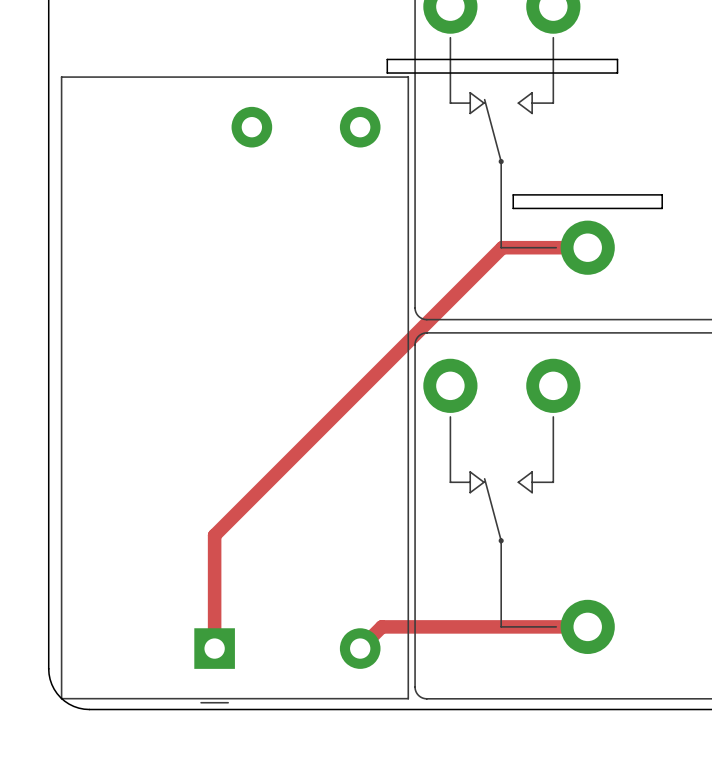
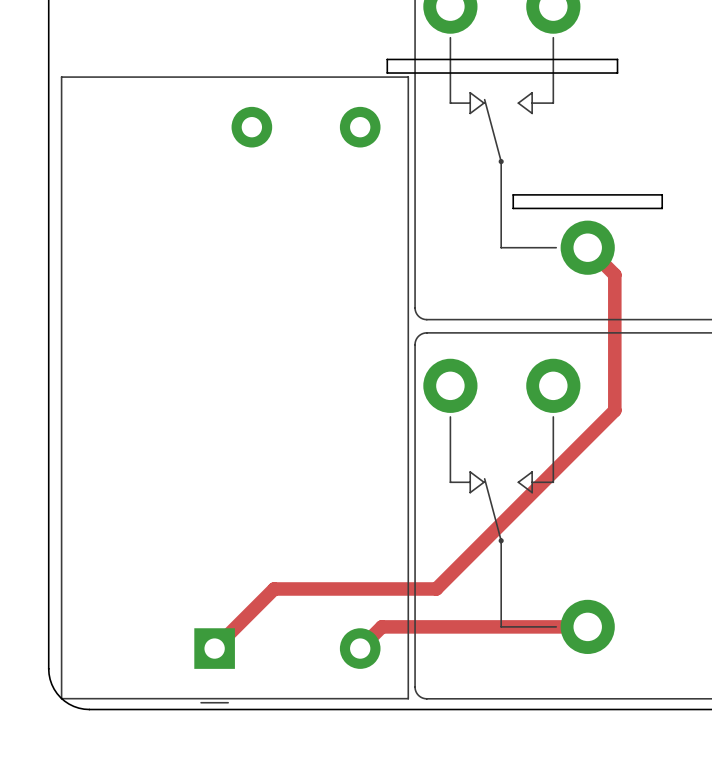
track: (587, 247) (502, 247) (214, 535) (214, 648) -> (587, 247) (614, 274) (614, 410) (436, 588) (274, 588) (214, 648)

